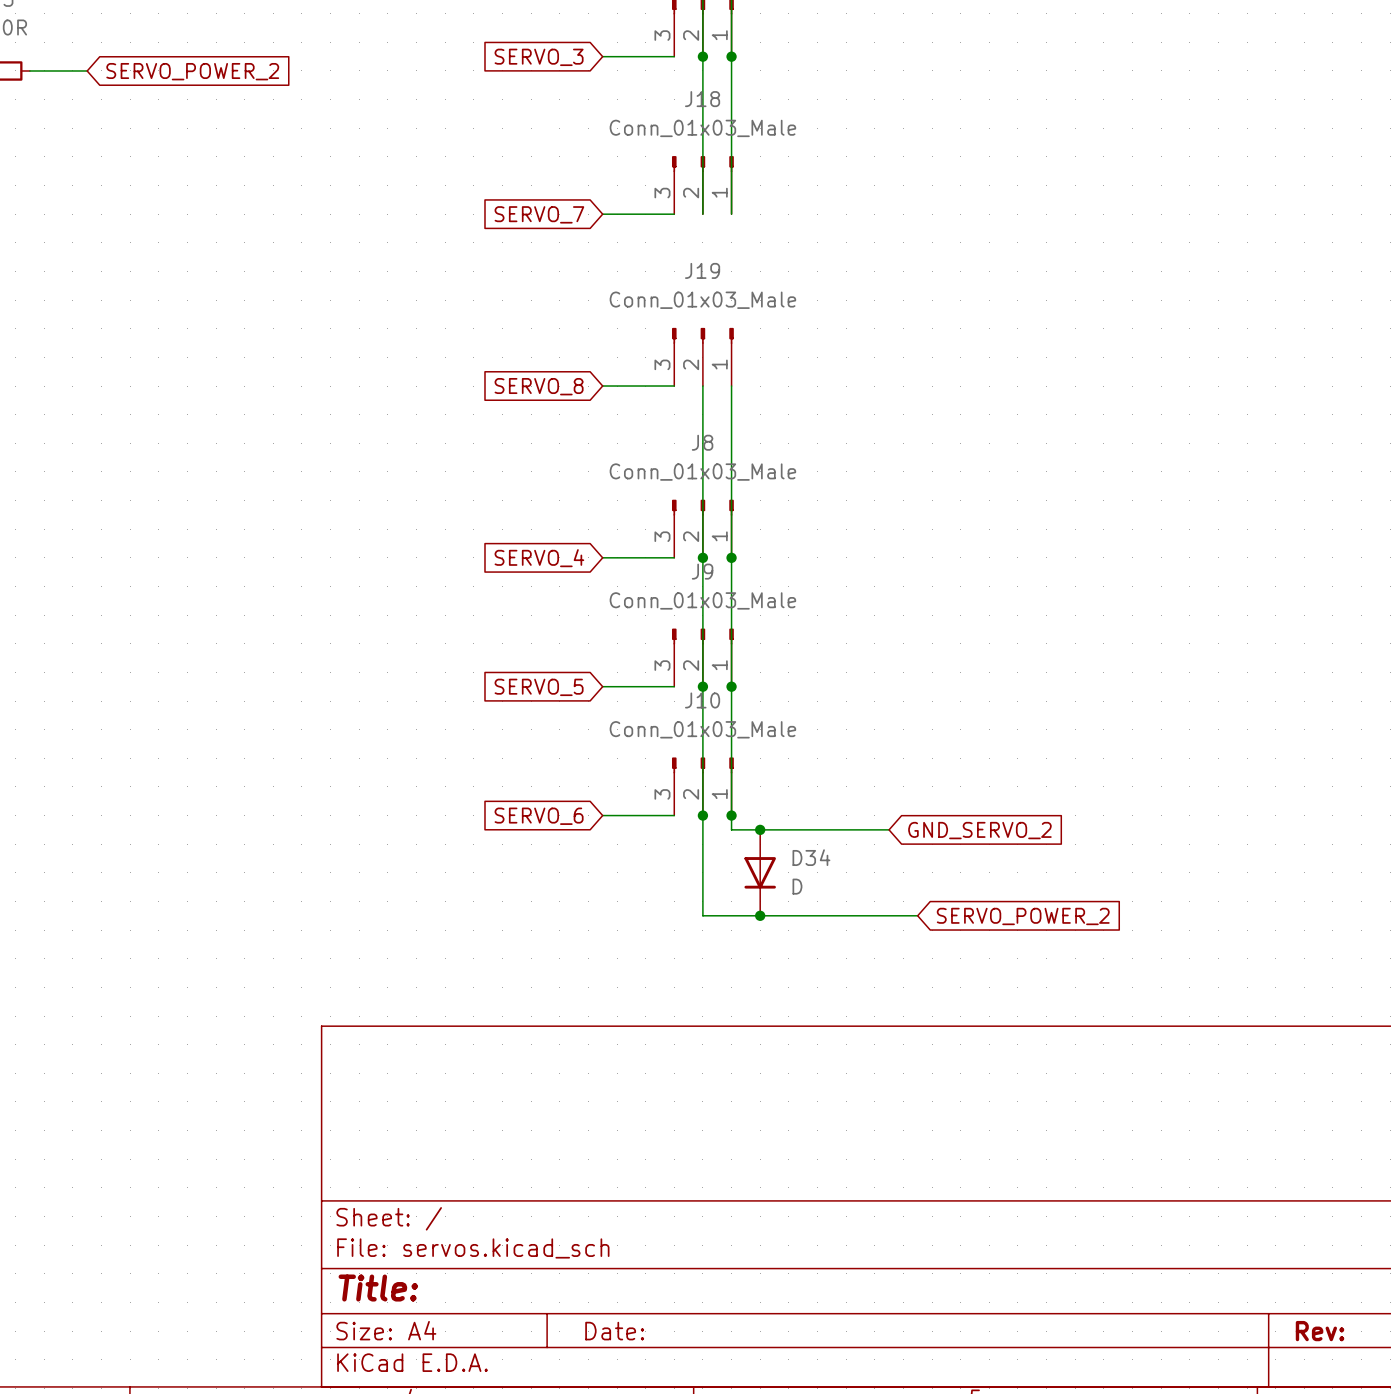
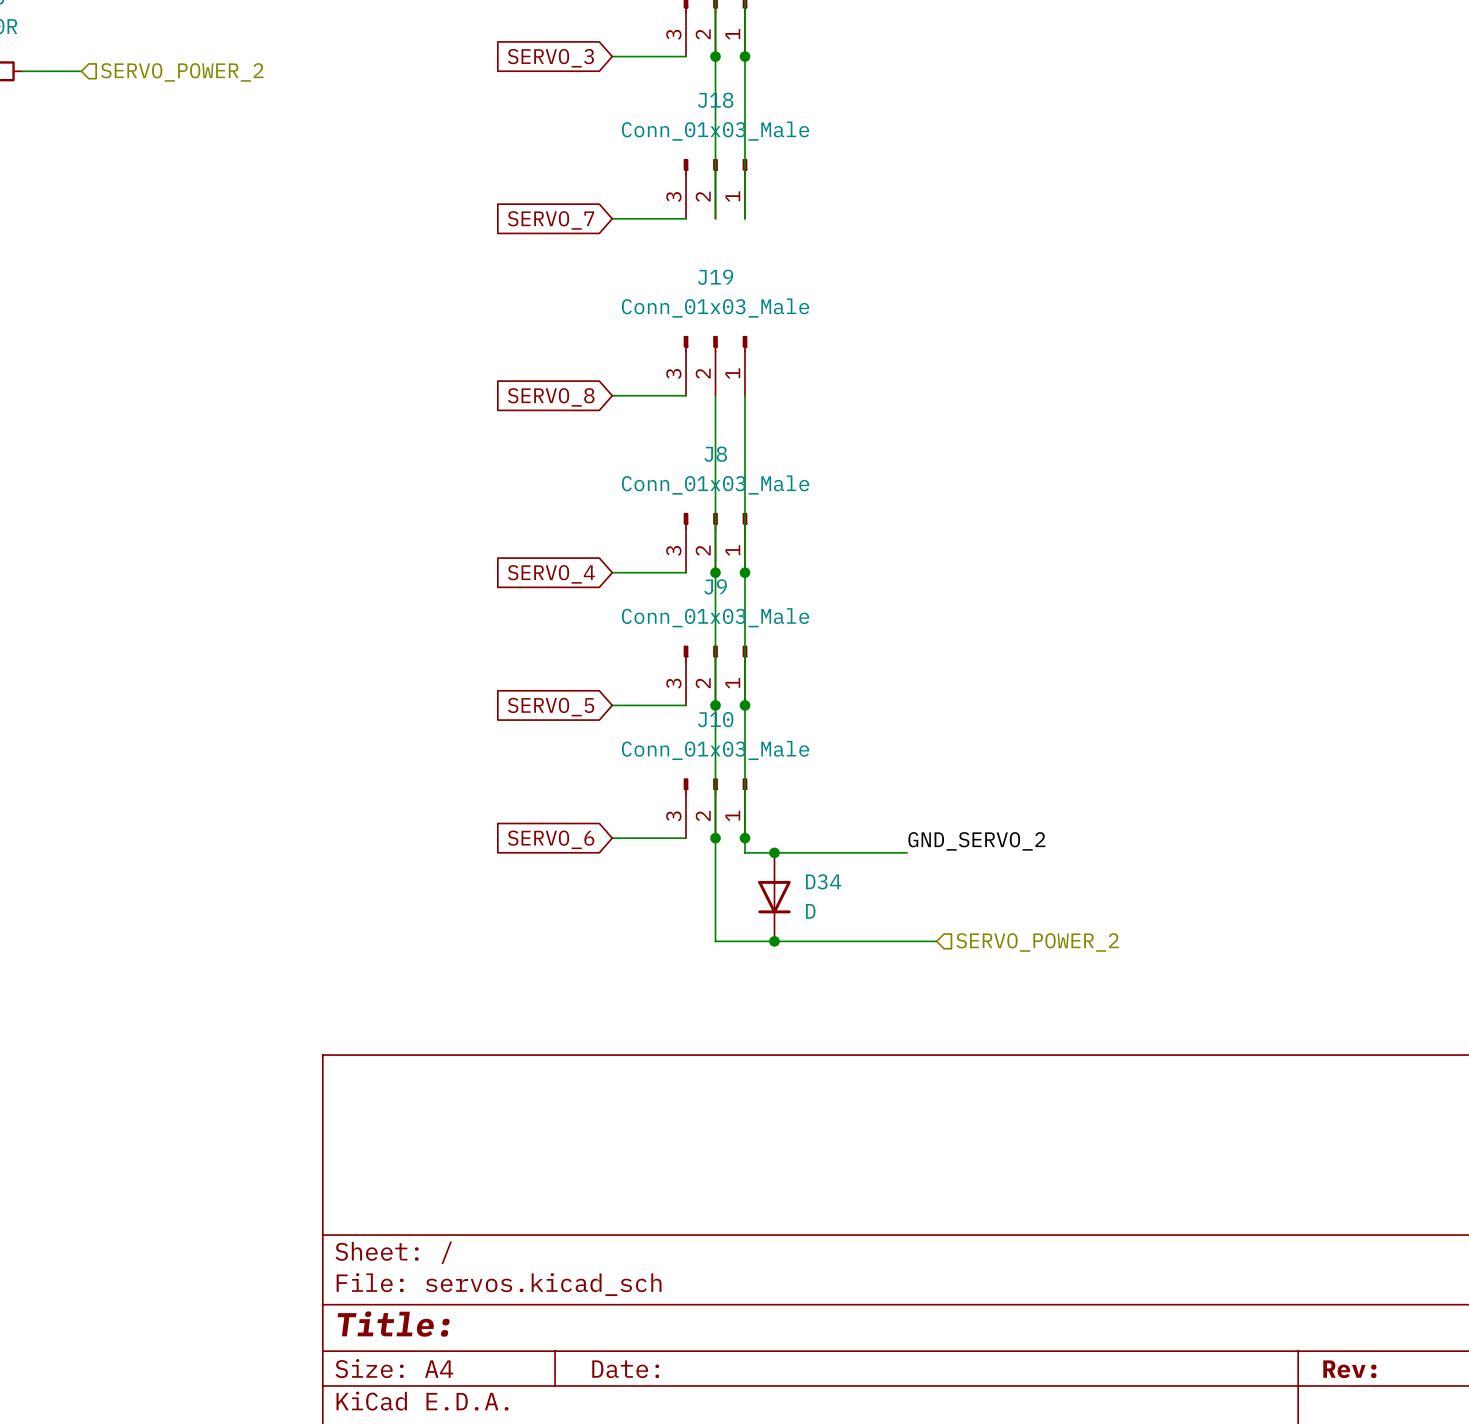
global label: SERVO_POWER_2 (192, 71) -> none
hierarchical label: none -> SERVO_POWER_2 (182, 72)
label: none -> GND_SERVO_2 (976, 841)
global label: GND_SERVO_2 (979, 830) -> none
hierarchical label: none -> SERVO_POWER_2 (1037, 942)
global label: SERVO_POWER_2 (1023, 916) -> none

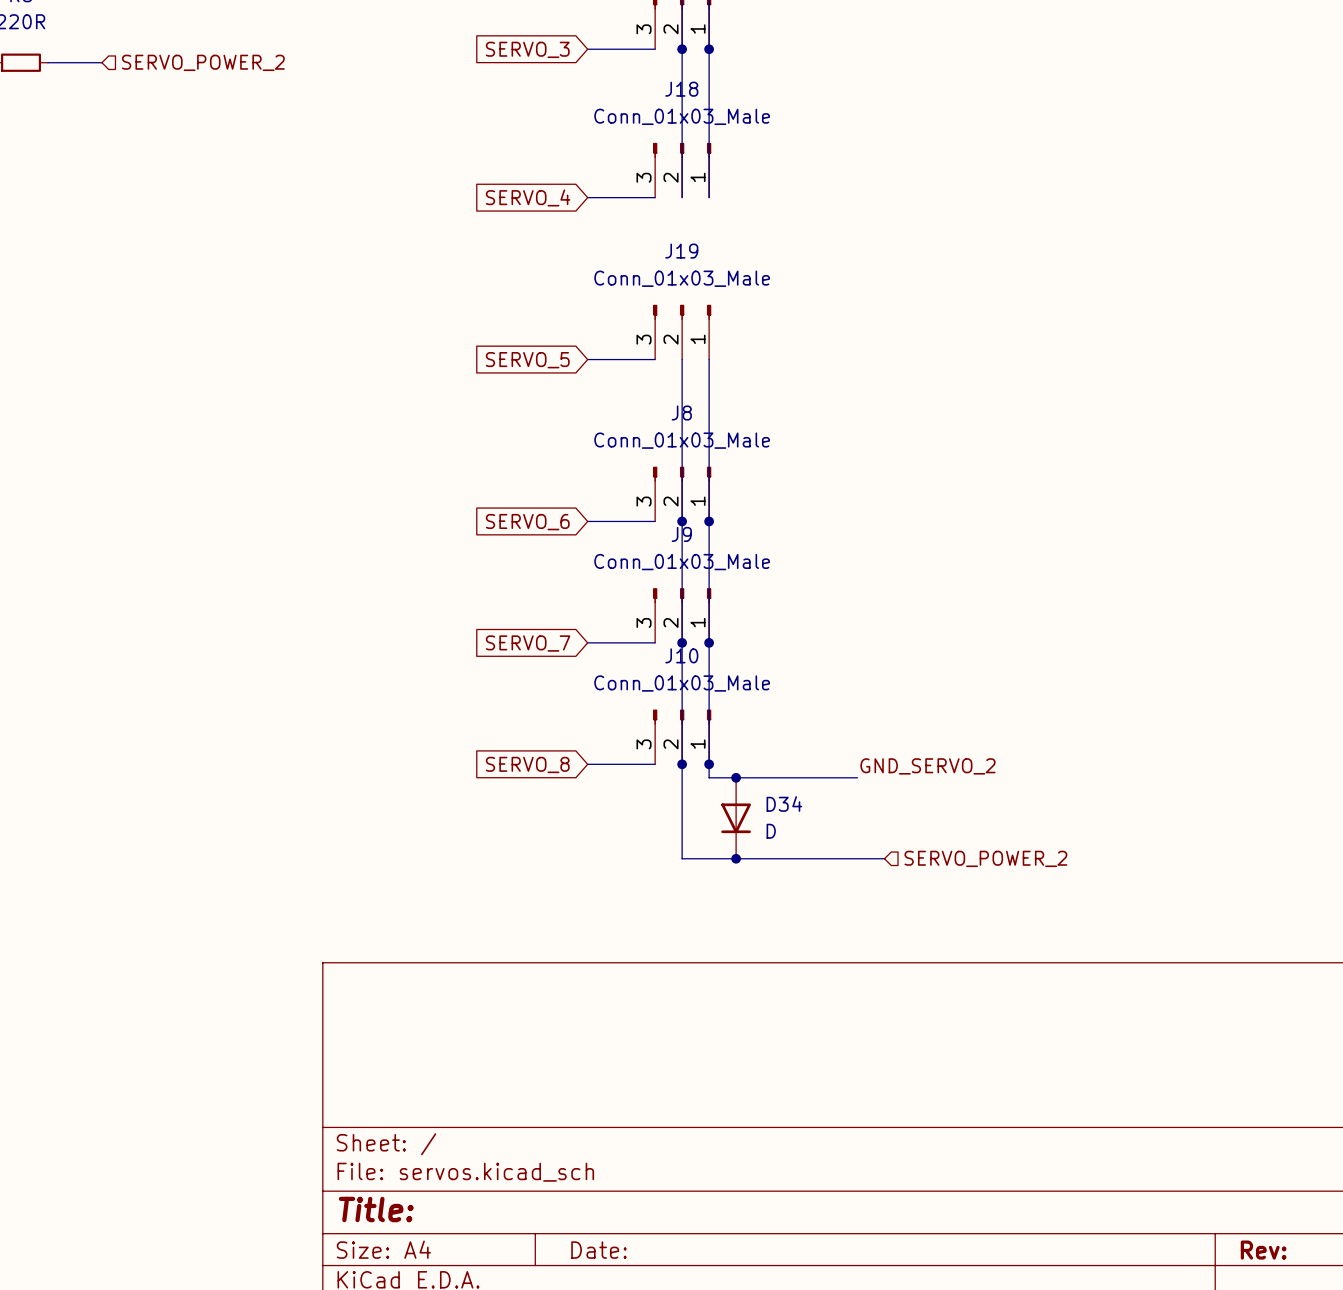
global label: SERVO_7 (551, 220) -> SERVO_4 (528, 197)
global label: SERVO_8 (551, 397) -> SERVO_5 (527, 360)
global label: SERVO_4 (551, 574) -> SERVO_6 (527, 522)
global label: SERVO_5 (551, 707) -> SERVO_7 (528, 643)
global label: SERVO_6 (551, 839) -> SERVO_8 (527, 764)

